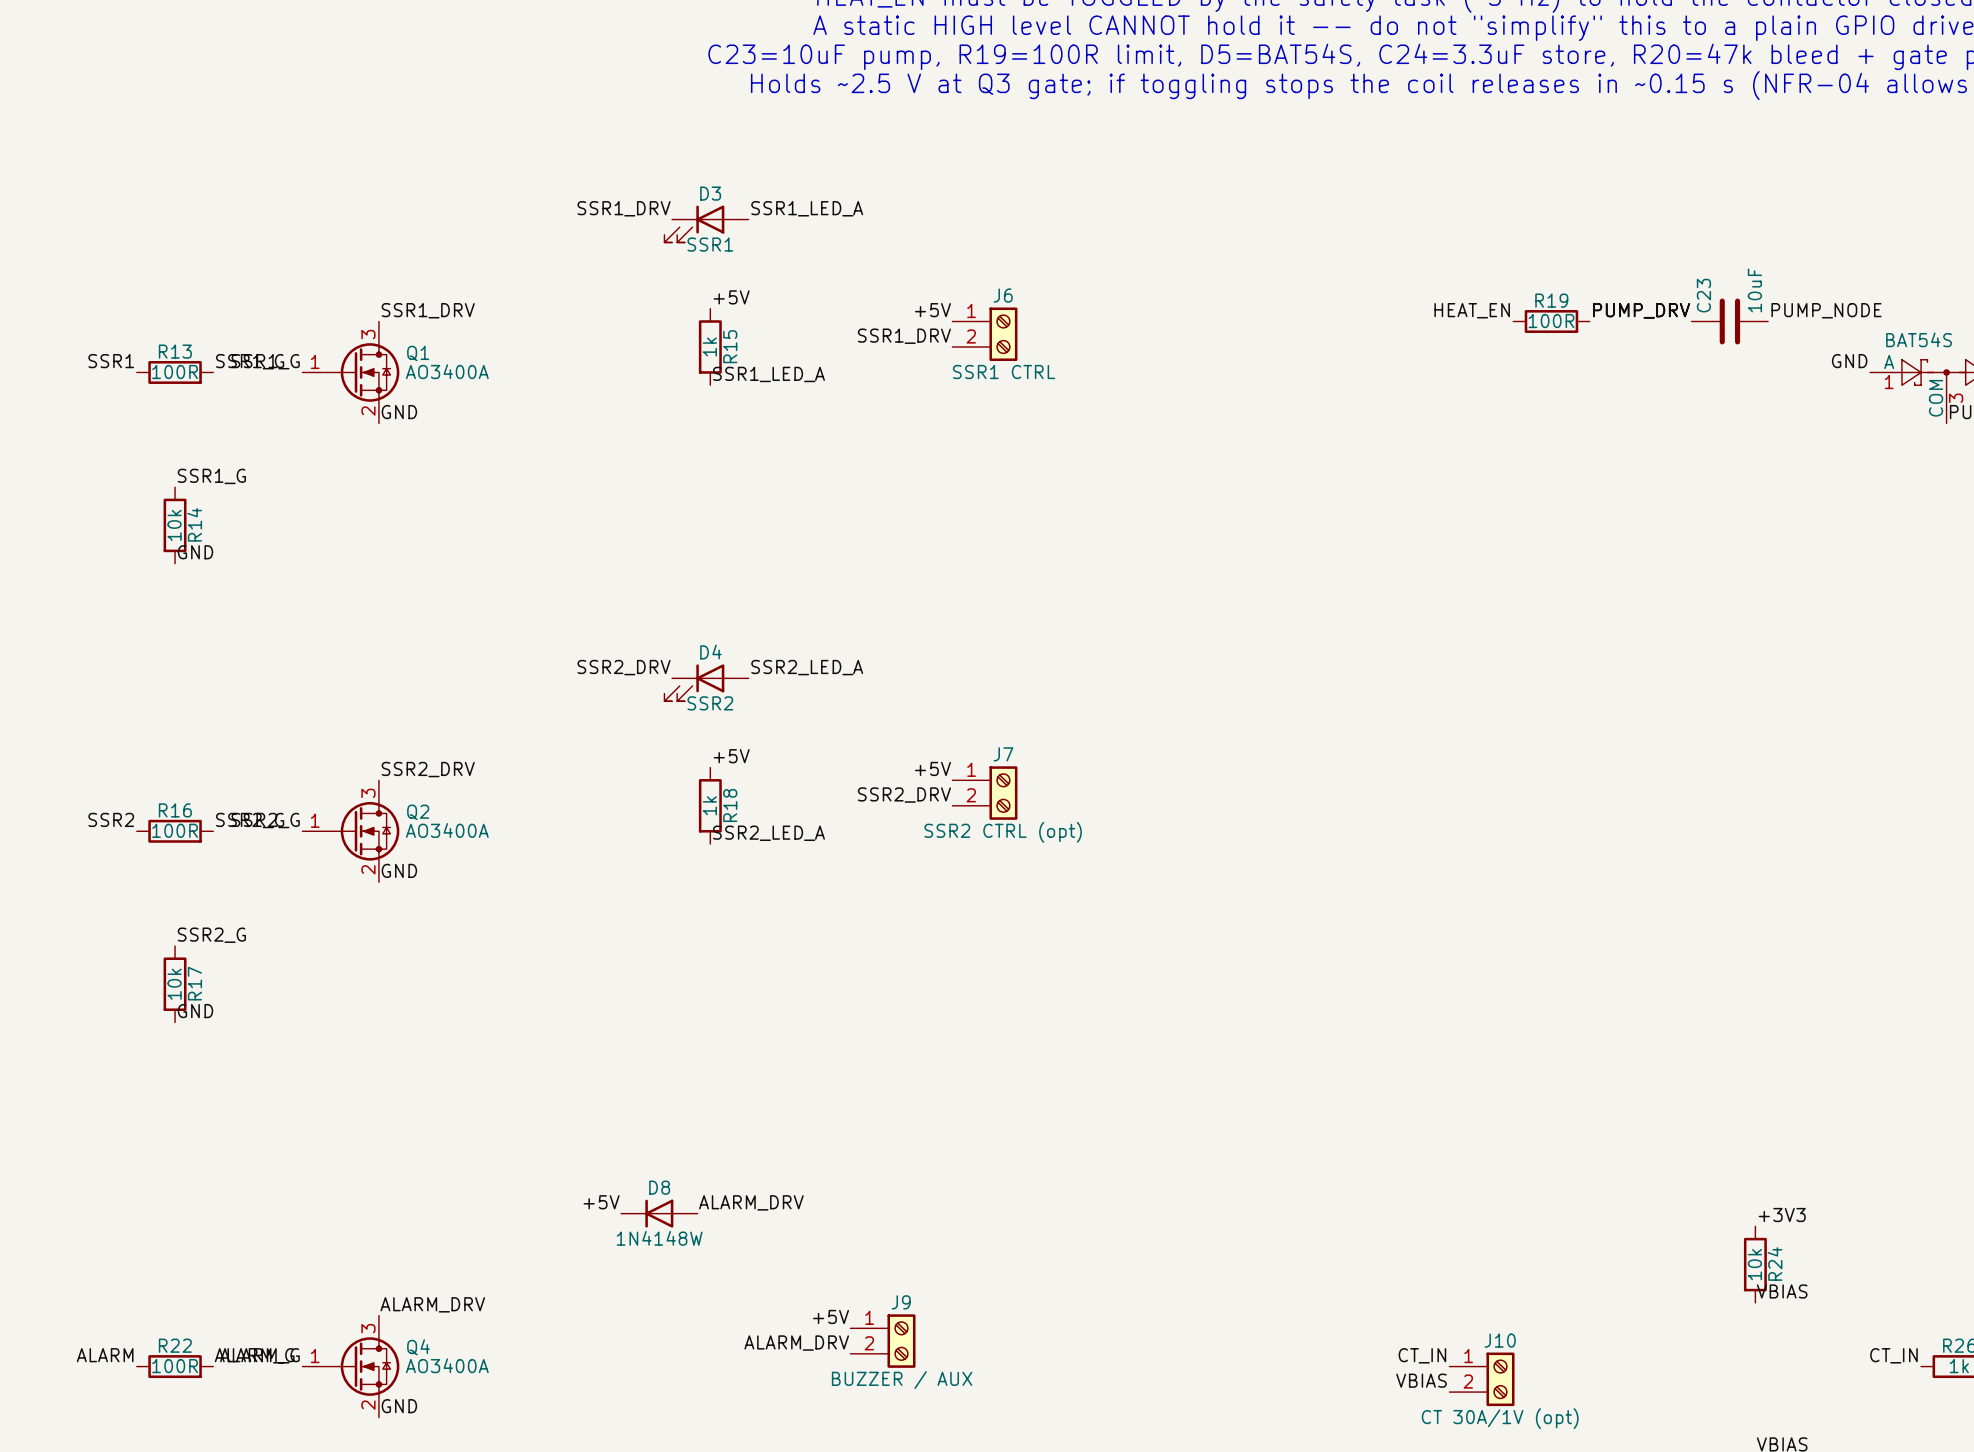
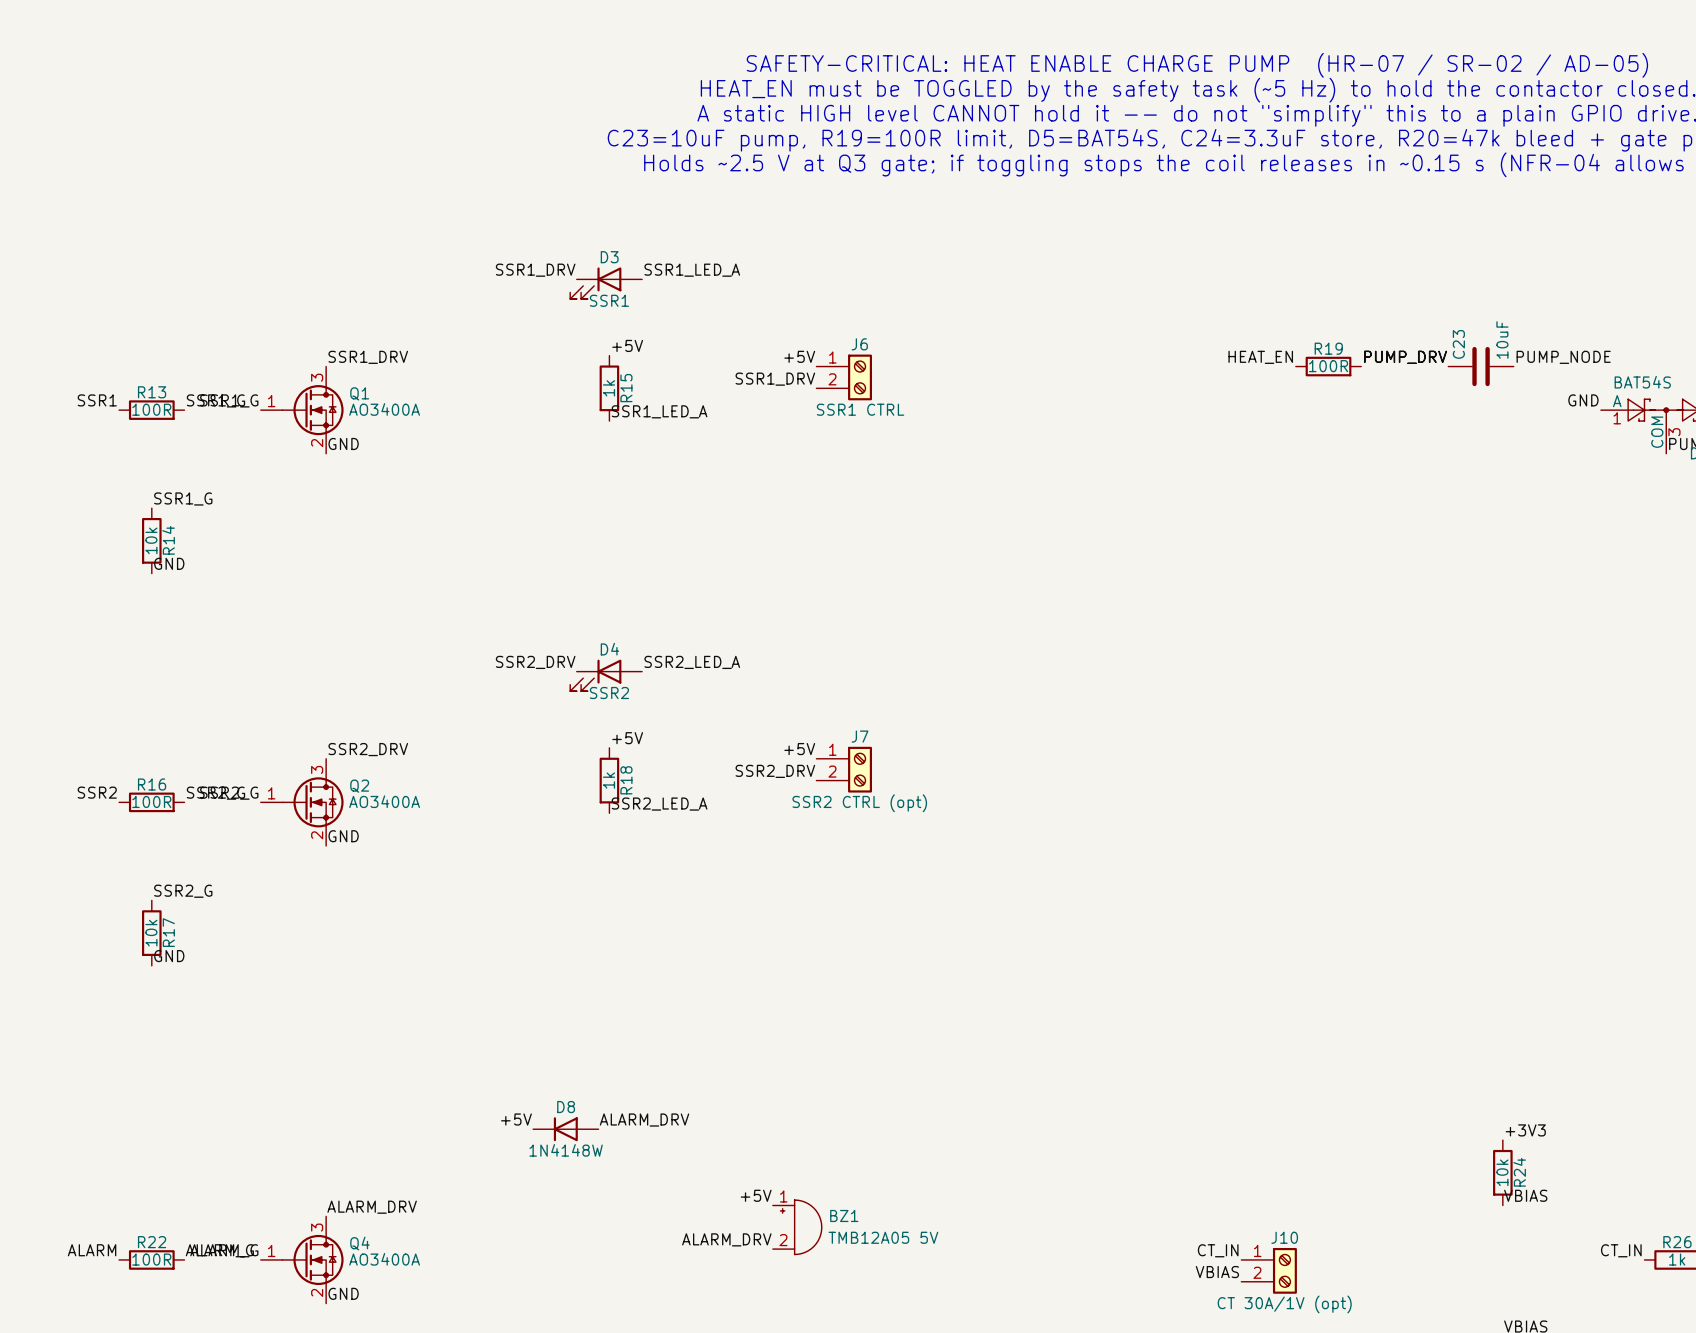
label position: +5V (831, 1316) -> +5V (756, 1195)
BZ1: none -> TMB12A05 5V (797, 1227)
J9: BUZZER / AUX (883, 1341) -> none
label position: ALARM_DRV (796, 1343) -> ALARM_DRV (726, 1239)

